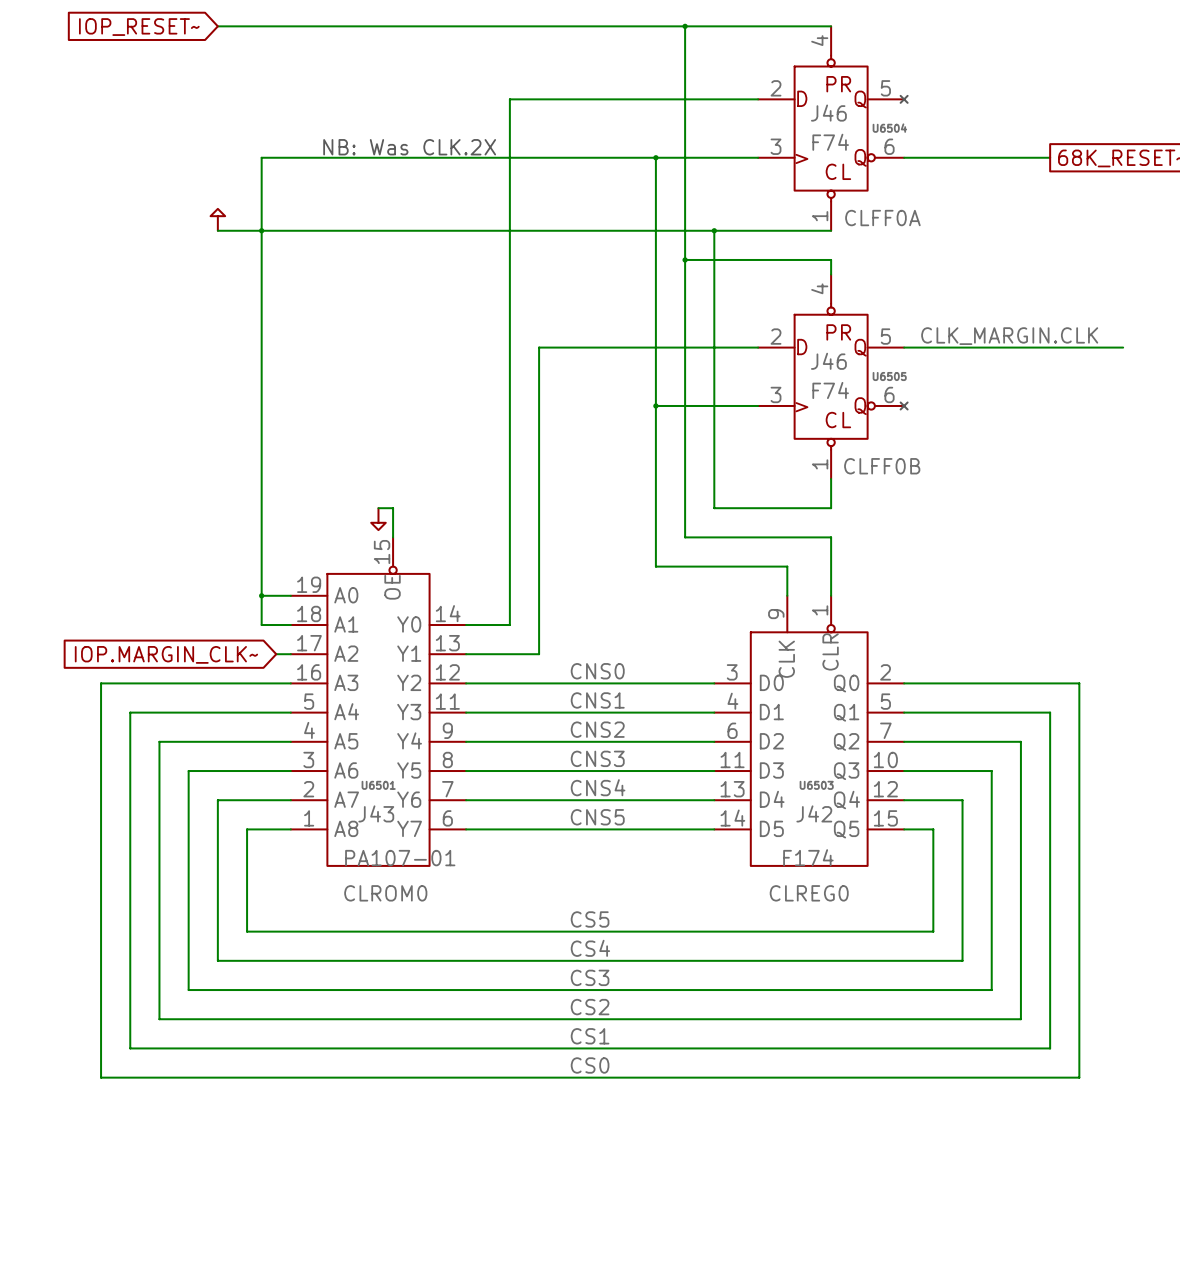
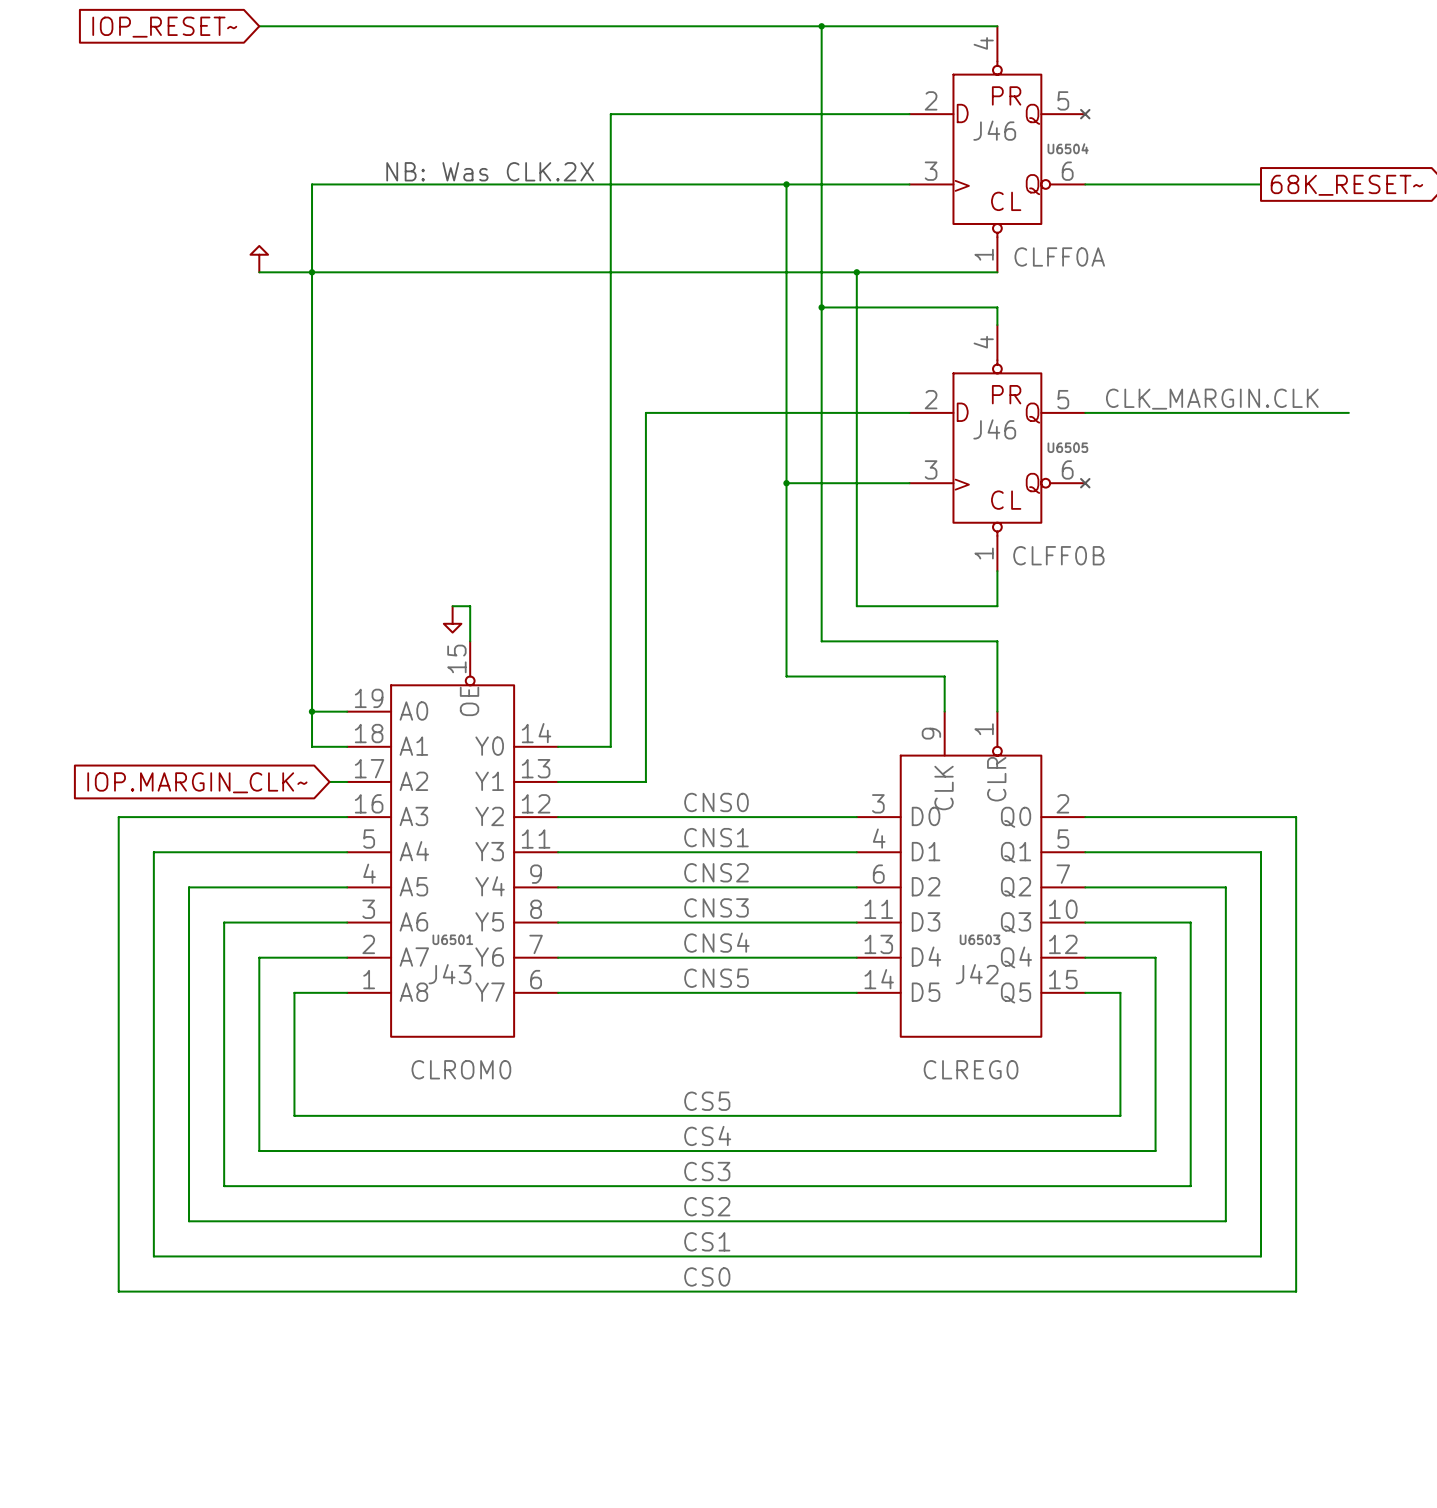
U6504 value: F74 (830, 142) -> none
U6505 value: F74 (830, 390) -> none
U6503 value: F174 (808, 857) -> none
U6501 value: PA107-01 (400, 858) -> none

